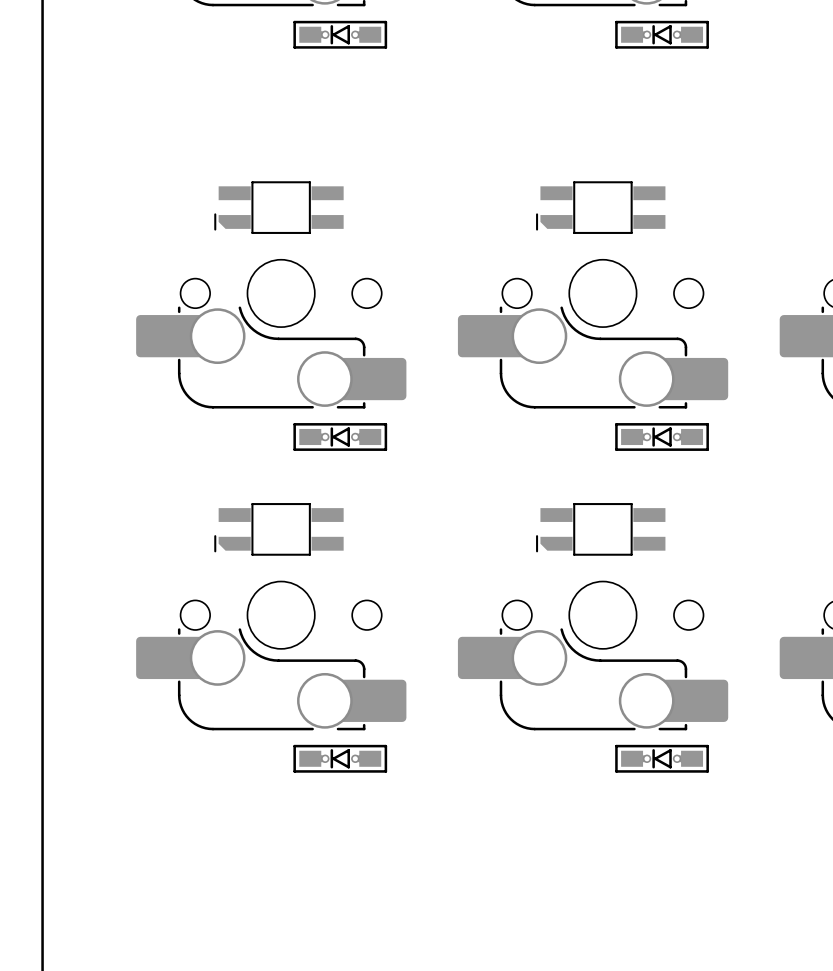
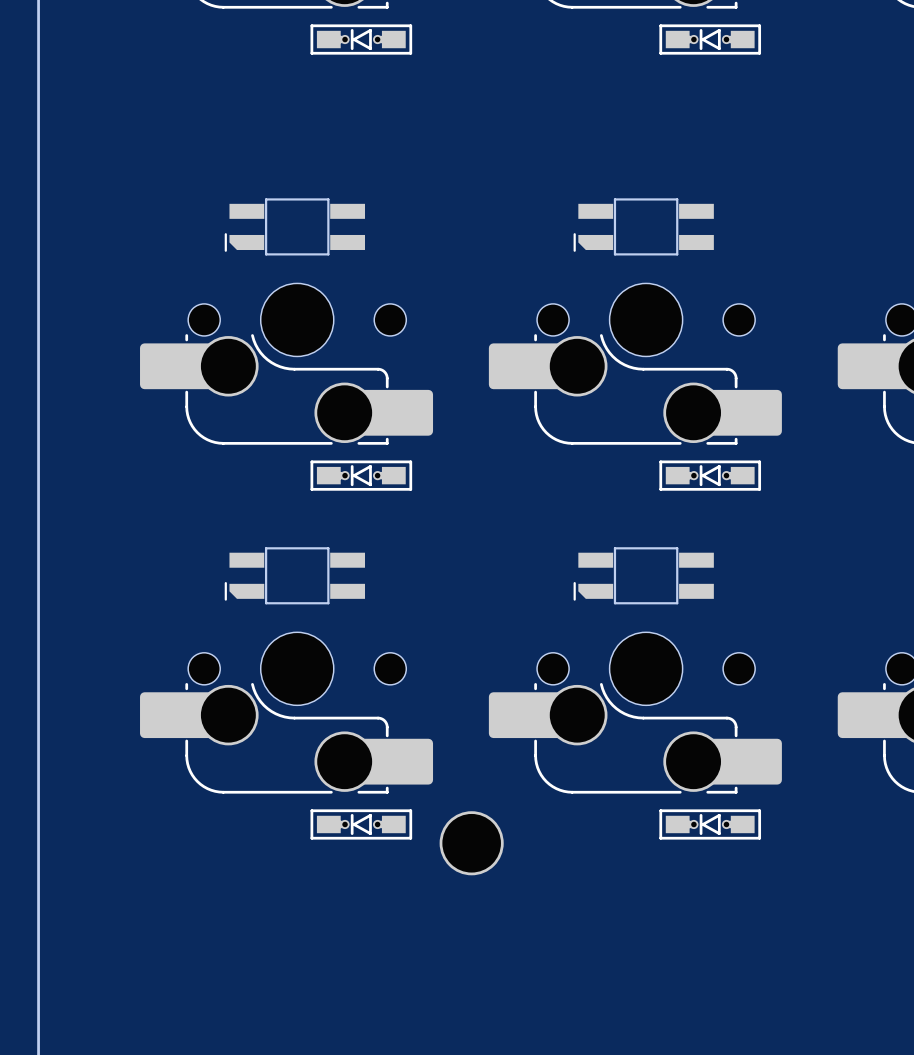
part: none -> (471, 843)

